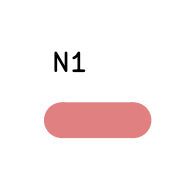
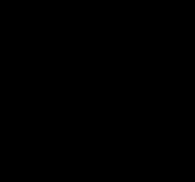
N1: (97, 120) -> none

